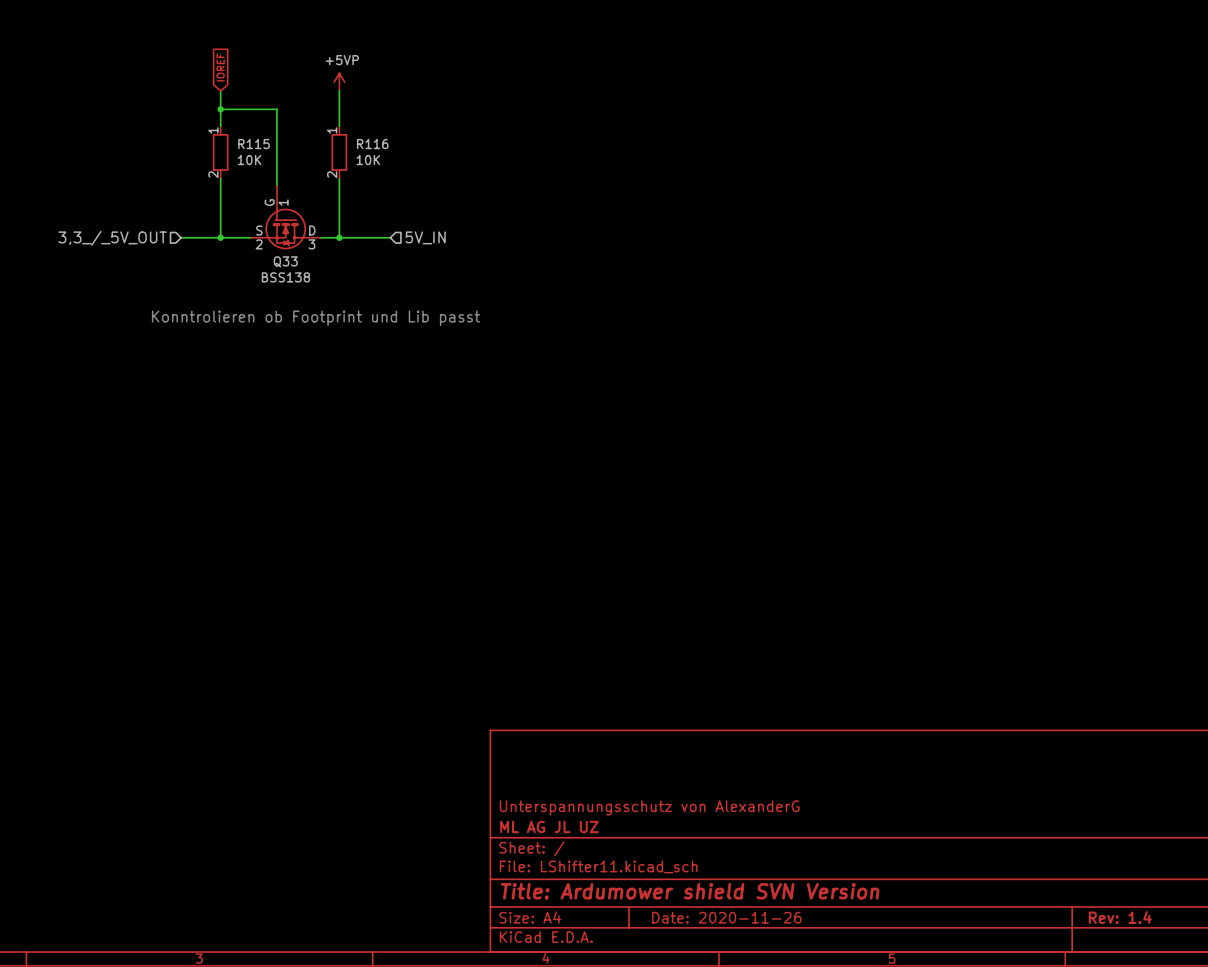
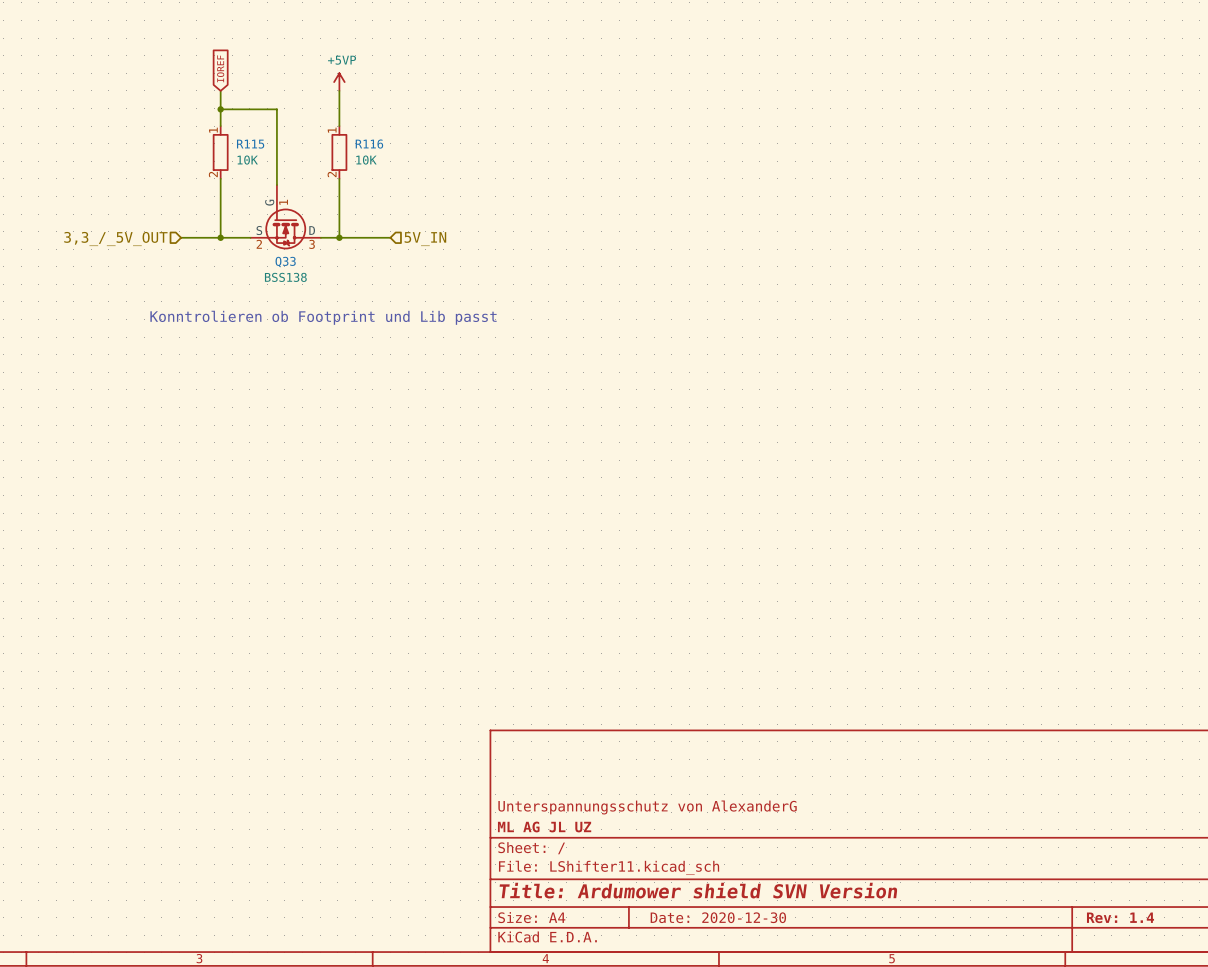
title block: Date: 2020-11-26 (726, 917) -> Date: 2020-12-30 (718, 917)

